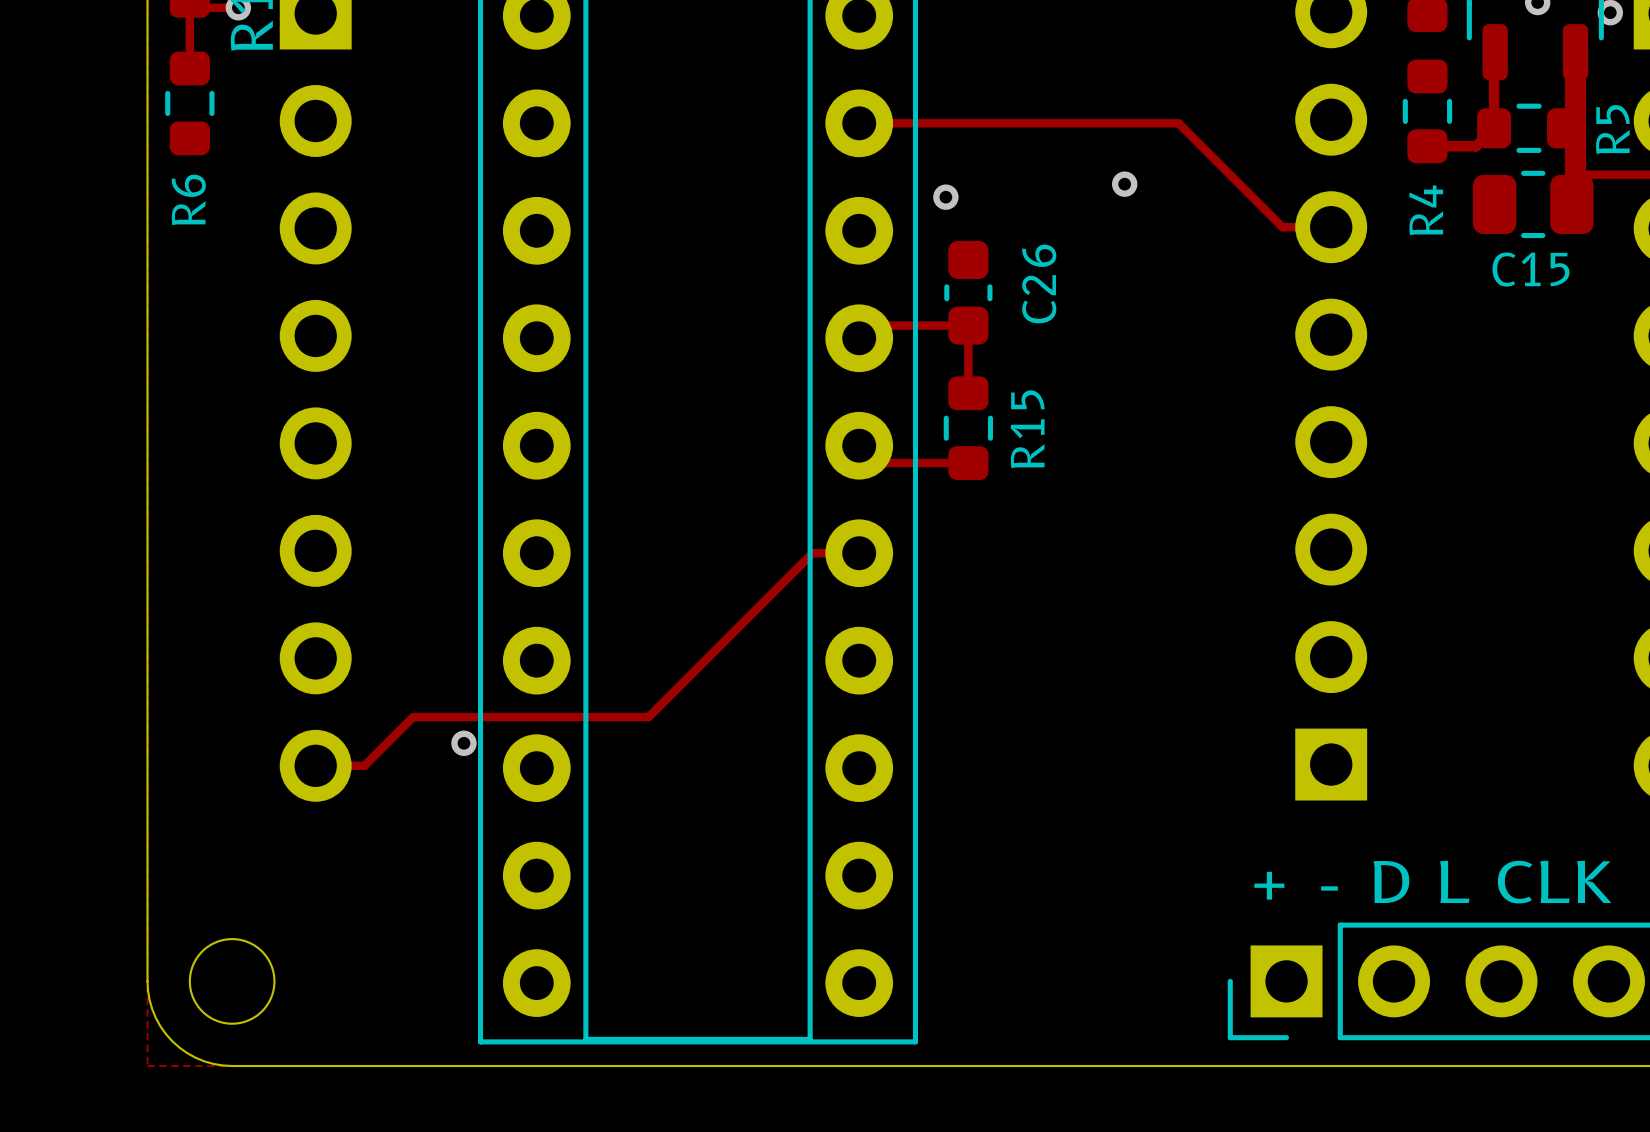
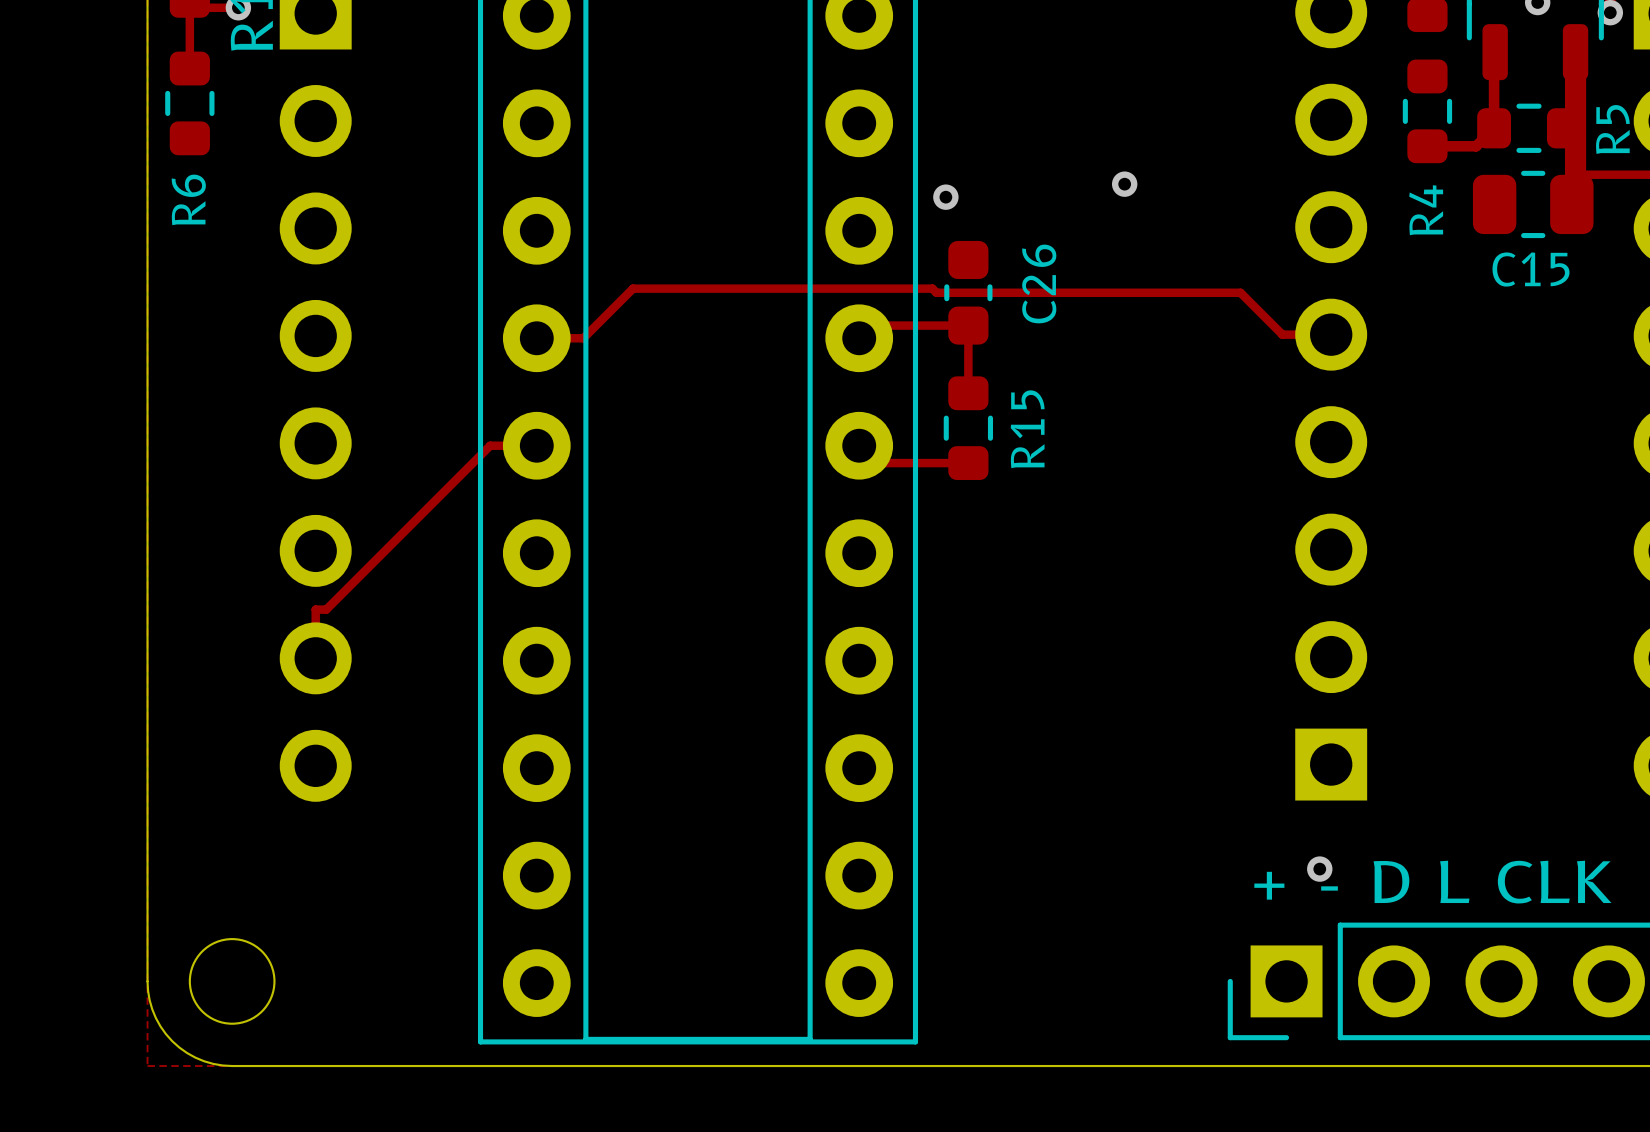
track: (859, 123) (1178, 123) (1282, 227) (1331, 227) -> none
track: none -> (1331, 334) (1282, 334) (1240, 292) (936, 292) (932, 288) (633, 288) (583, 338) (536, 338)
track: none -> (536, 445) (490, 445) (326, 609) (315, 609) (315, 658)
track: (859, 553) (812, 553) (648, 717) (413, 717) (364, 765) (315, 765) -> none
via: (463, 743) -> none
via: none -> (1319, 869)

